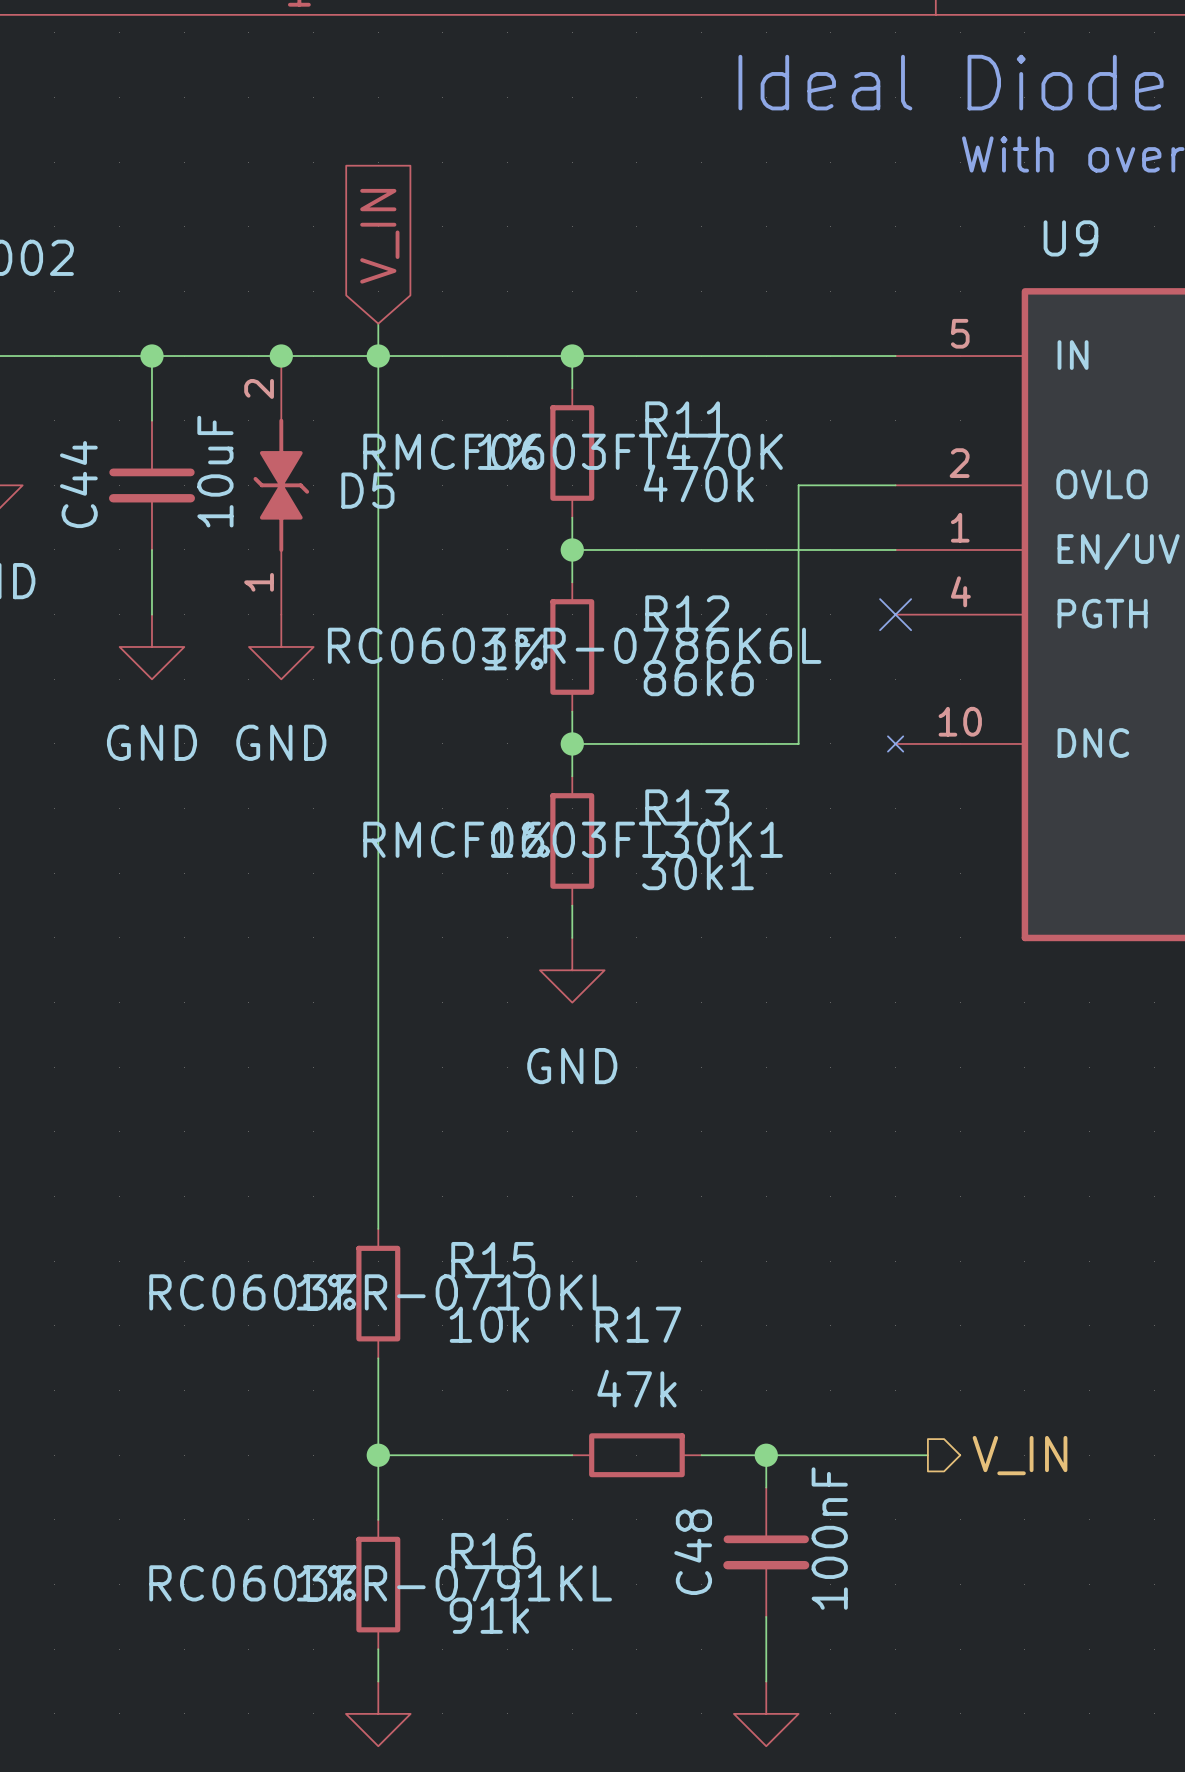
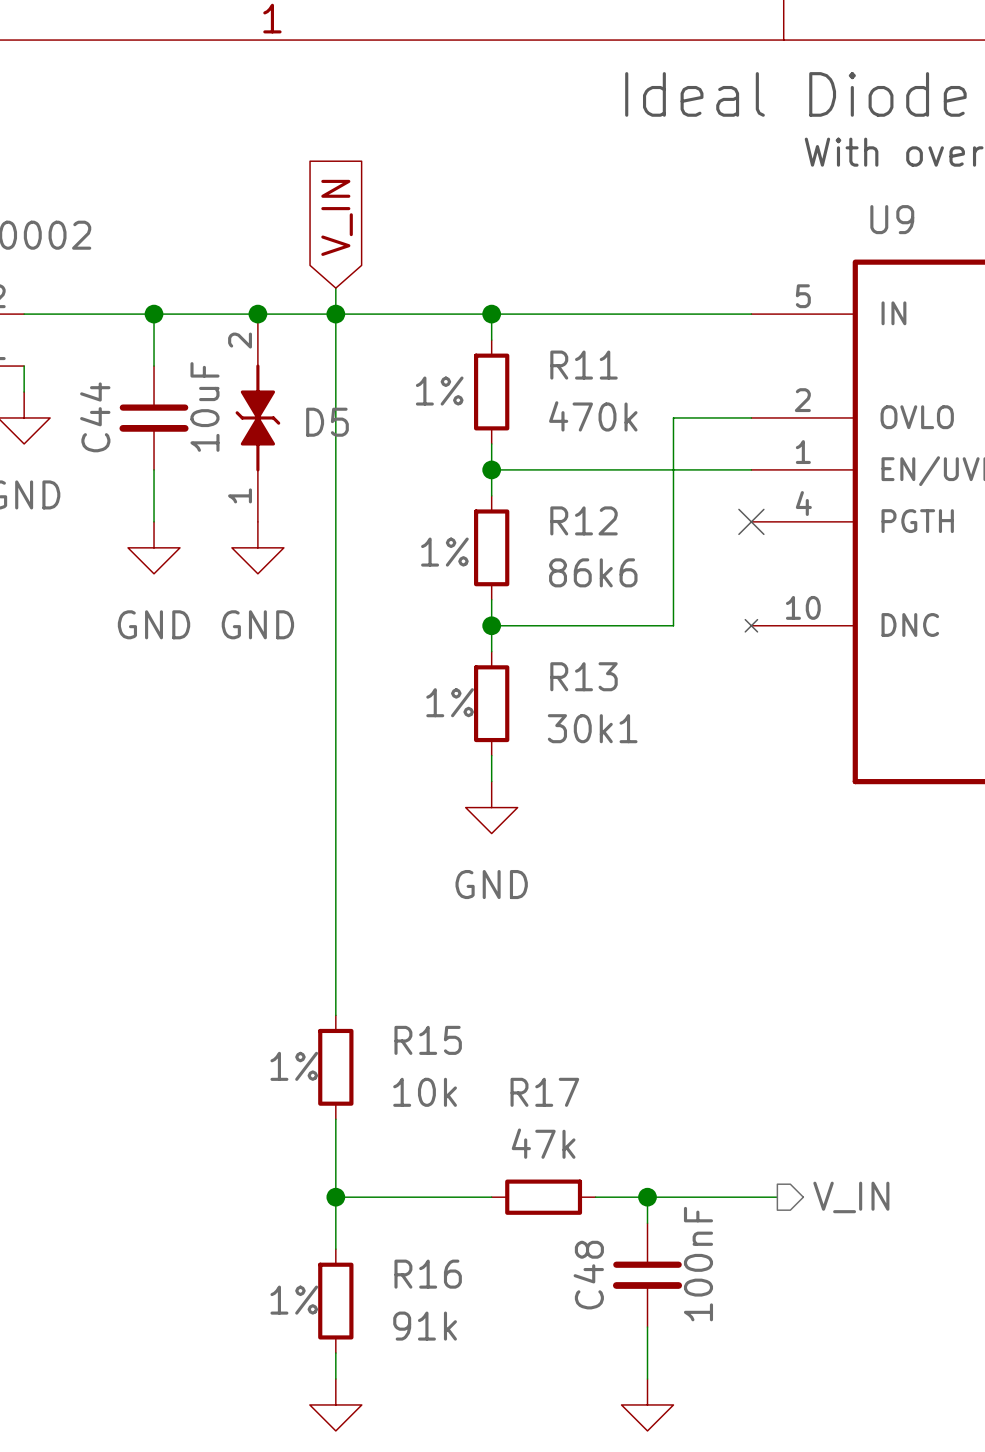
R11 text: RMCF0603FT470K (573, 451) -> none
R12 text: RC0603FR-0786K6L (574, 645) -> none
R13 text: RMCF0603FT30K1 (573, 839) -> none
R15 text: RC0603FR-0710KL (380, 1292) -> none
R16 text: RC0603FR-0791KL (380, 1583) -> none

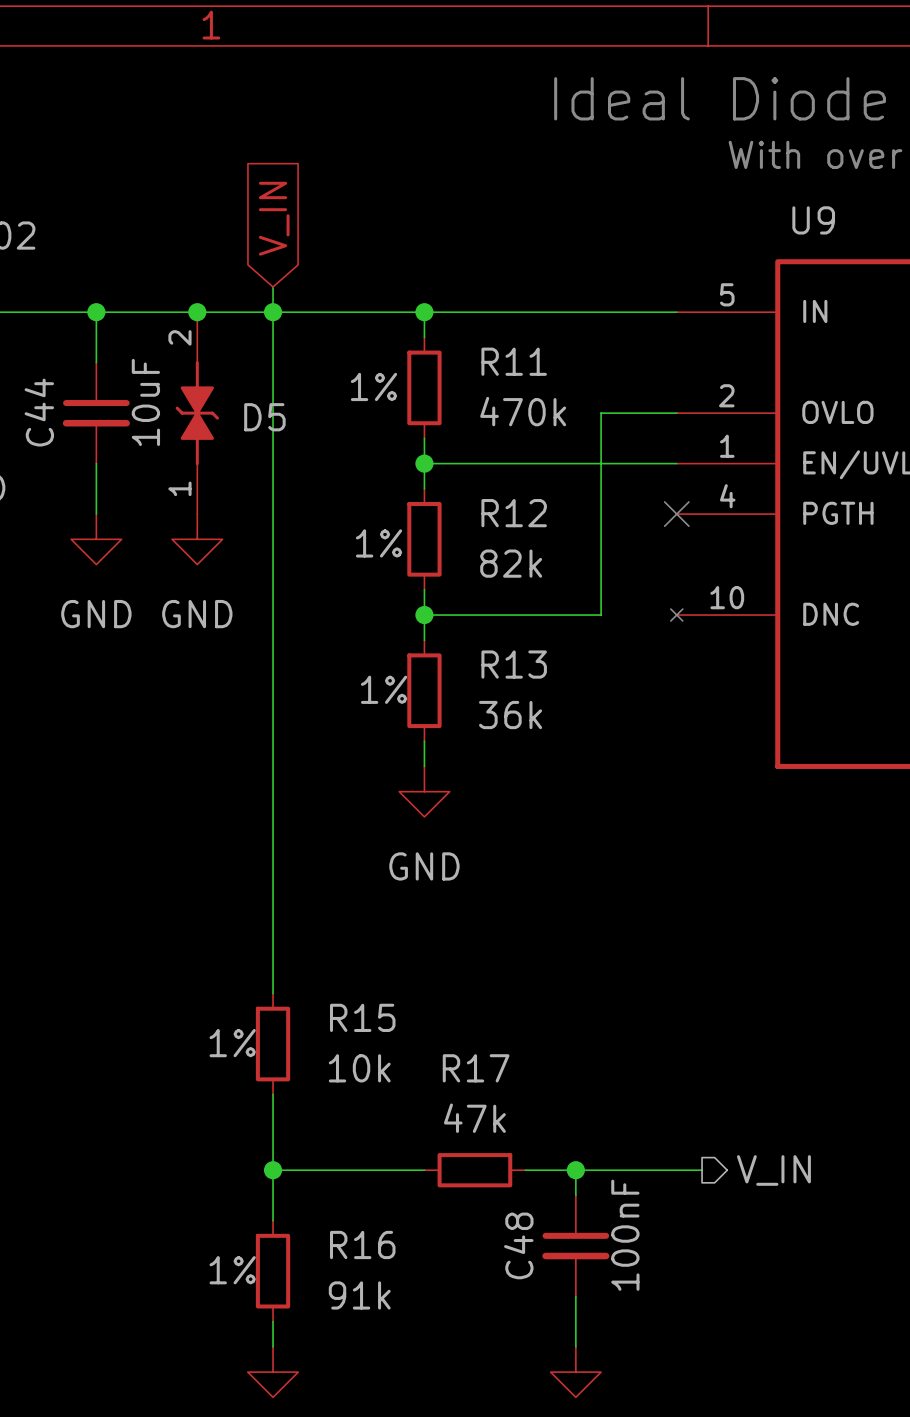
R12 value: 86k6 (593, 572) -> 82k (511, 563)
R13 value: 30k1 (592, 728) -> 36k (510, 715)

